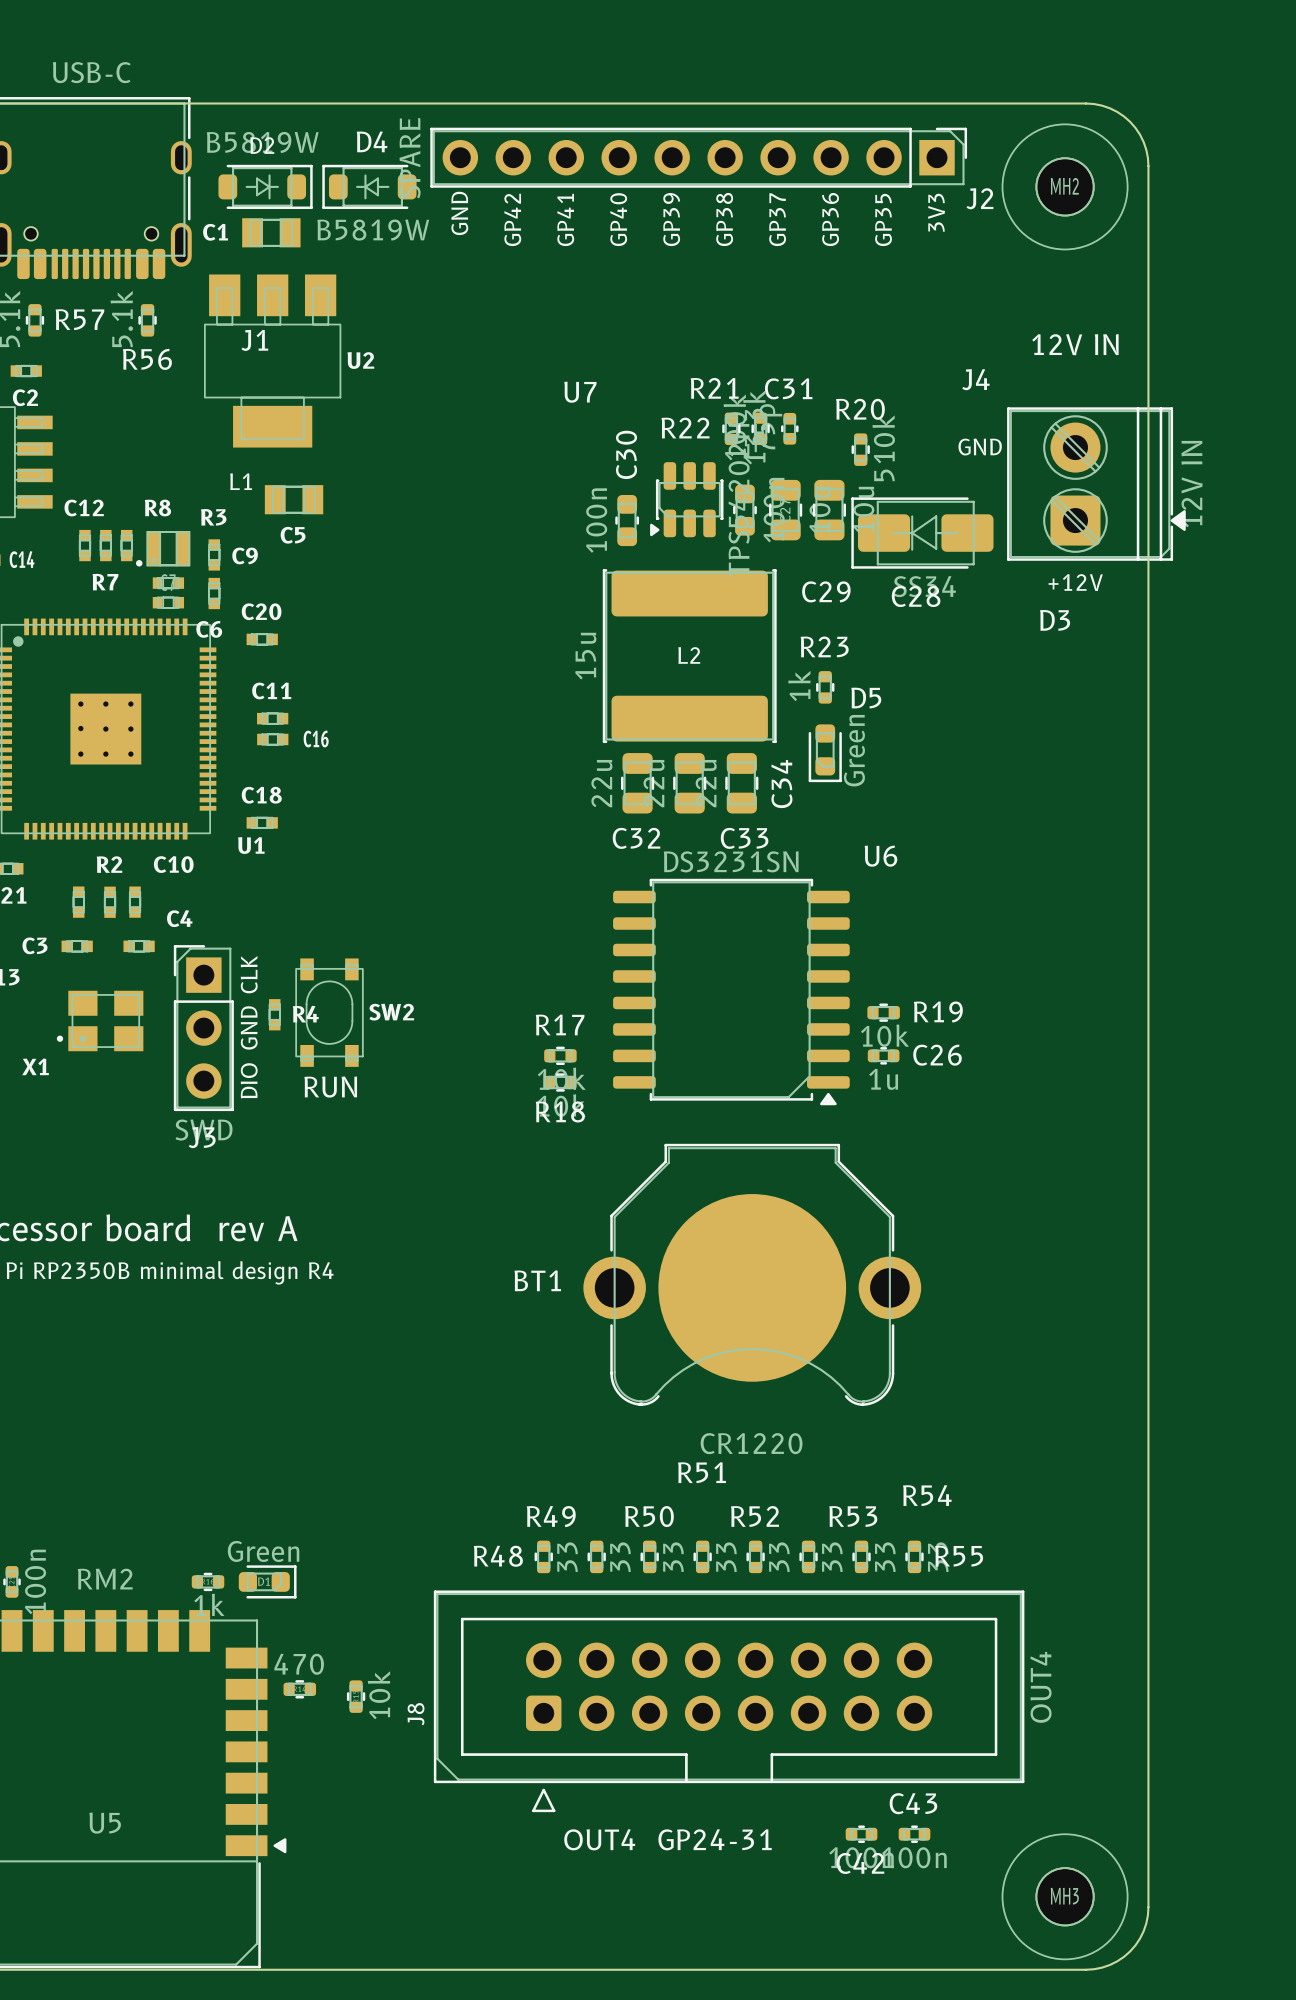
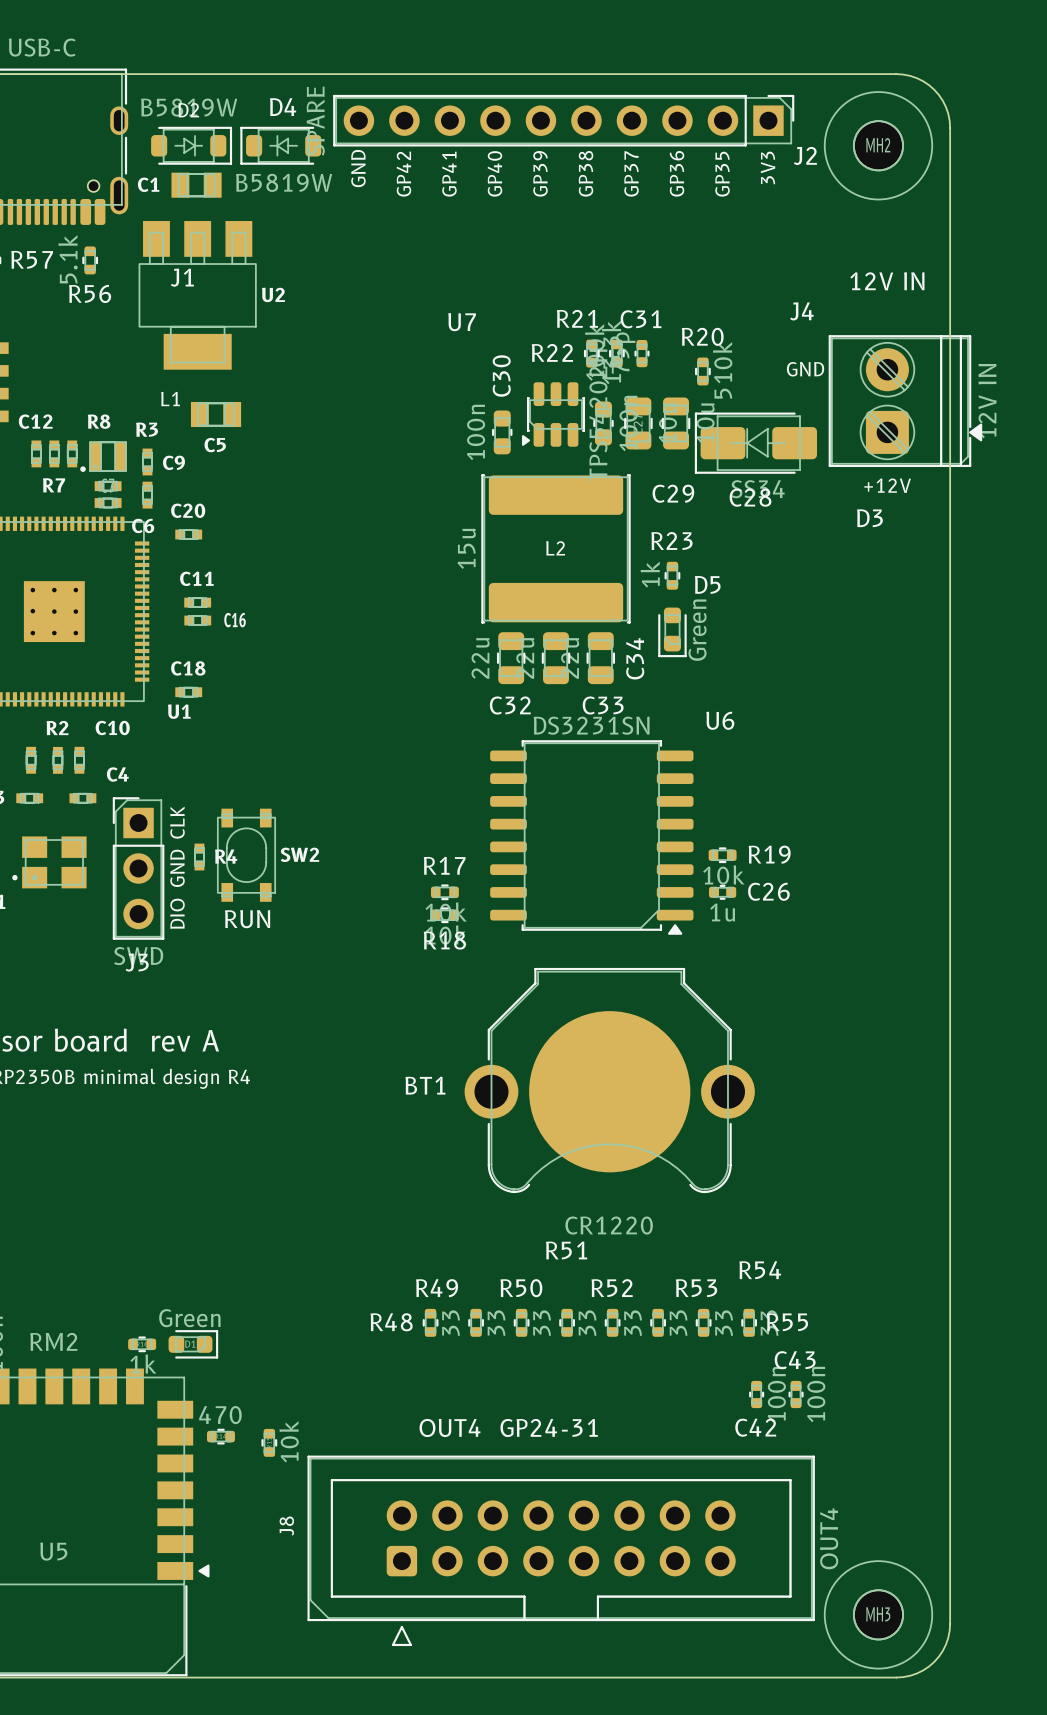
J8 position: (729, 1701) -> (561, 1550)
J8 name position: J8 (416, 1714) -> J8 (286, 1526)
C42 rotation: 0° (861, 1834) -> 90° clockwise (756, 1394)
C42 position: (861, 1834) -> (756, 1394)
C43 rotation: 0° (914, 1834) -> 90° clockwise (796, 1394)
C43 position: (914, 1834) -> (796, 1394)
text position: OUT4 GP24-31 (667, 1839) -> OUT4 GP24-31 (508, 1427)

